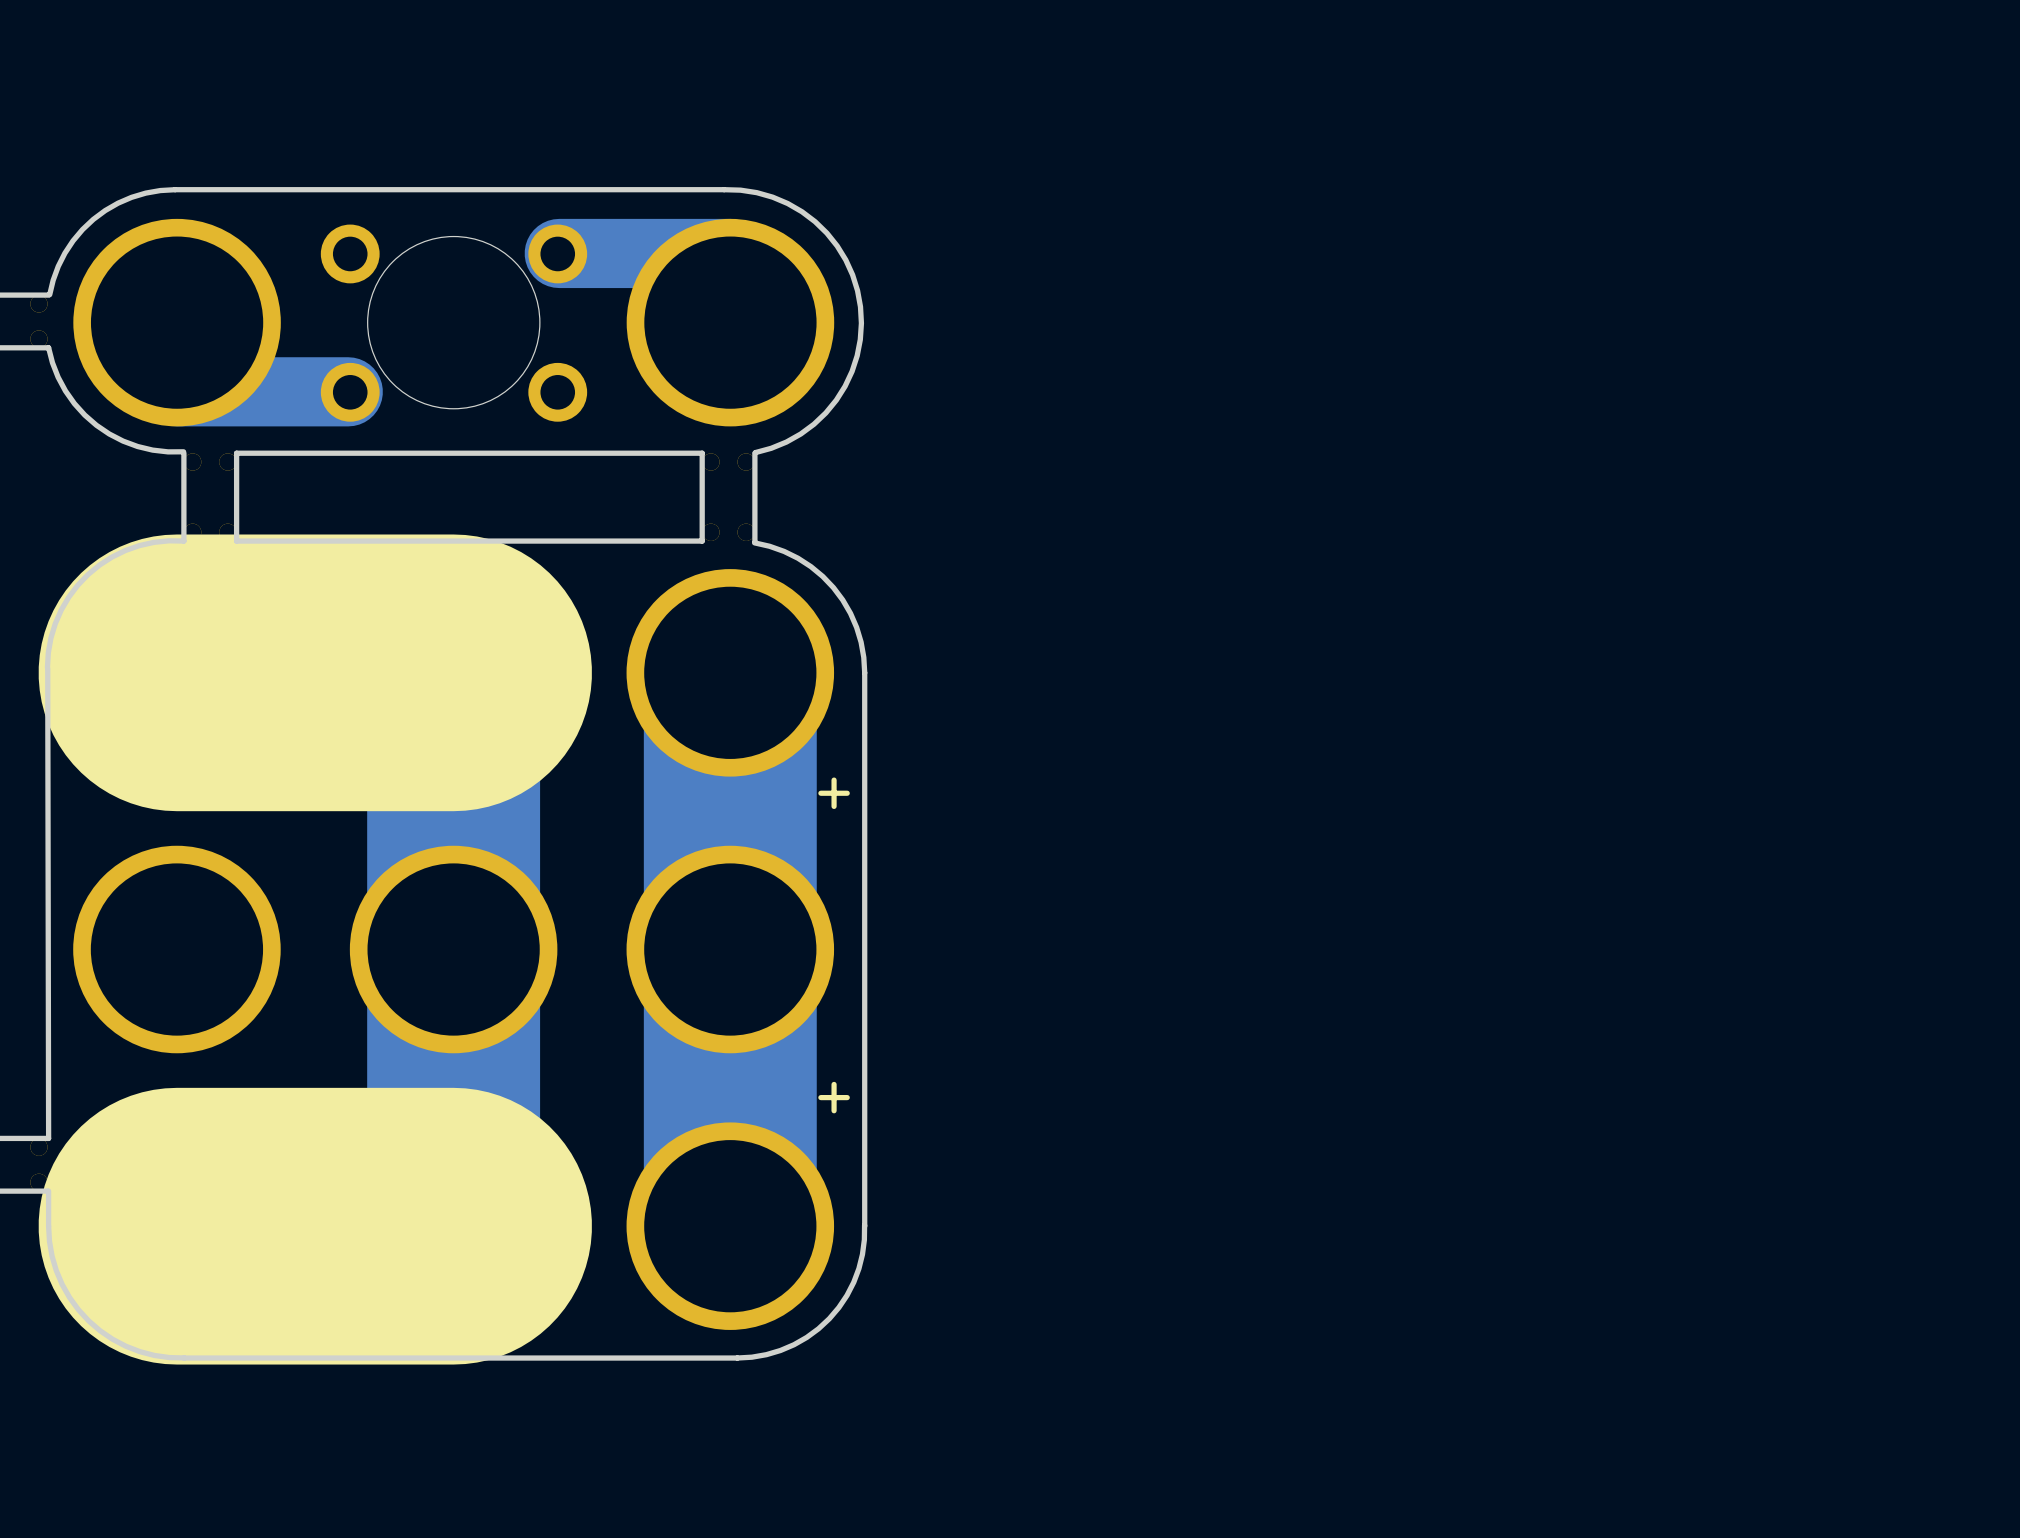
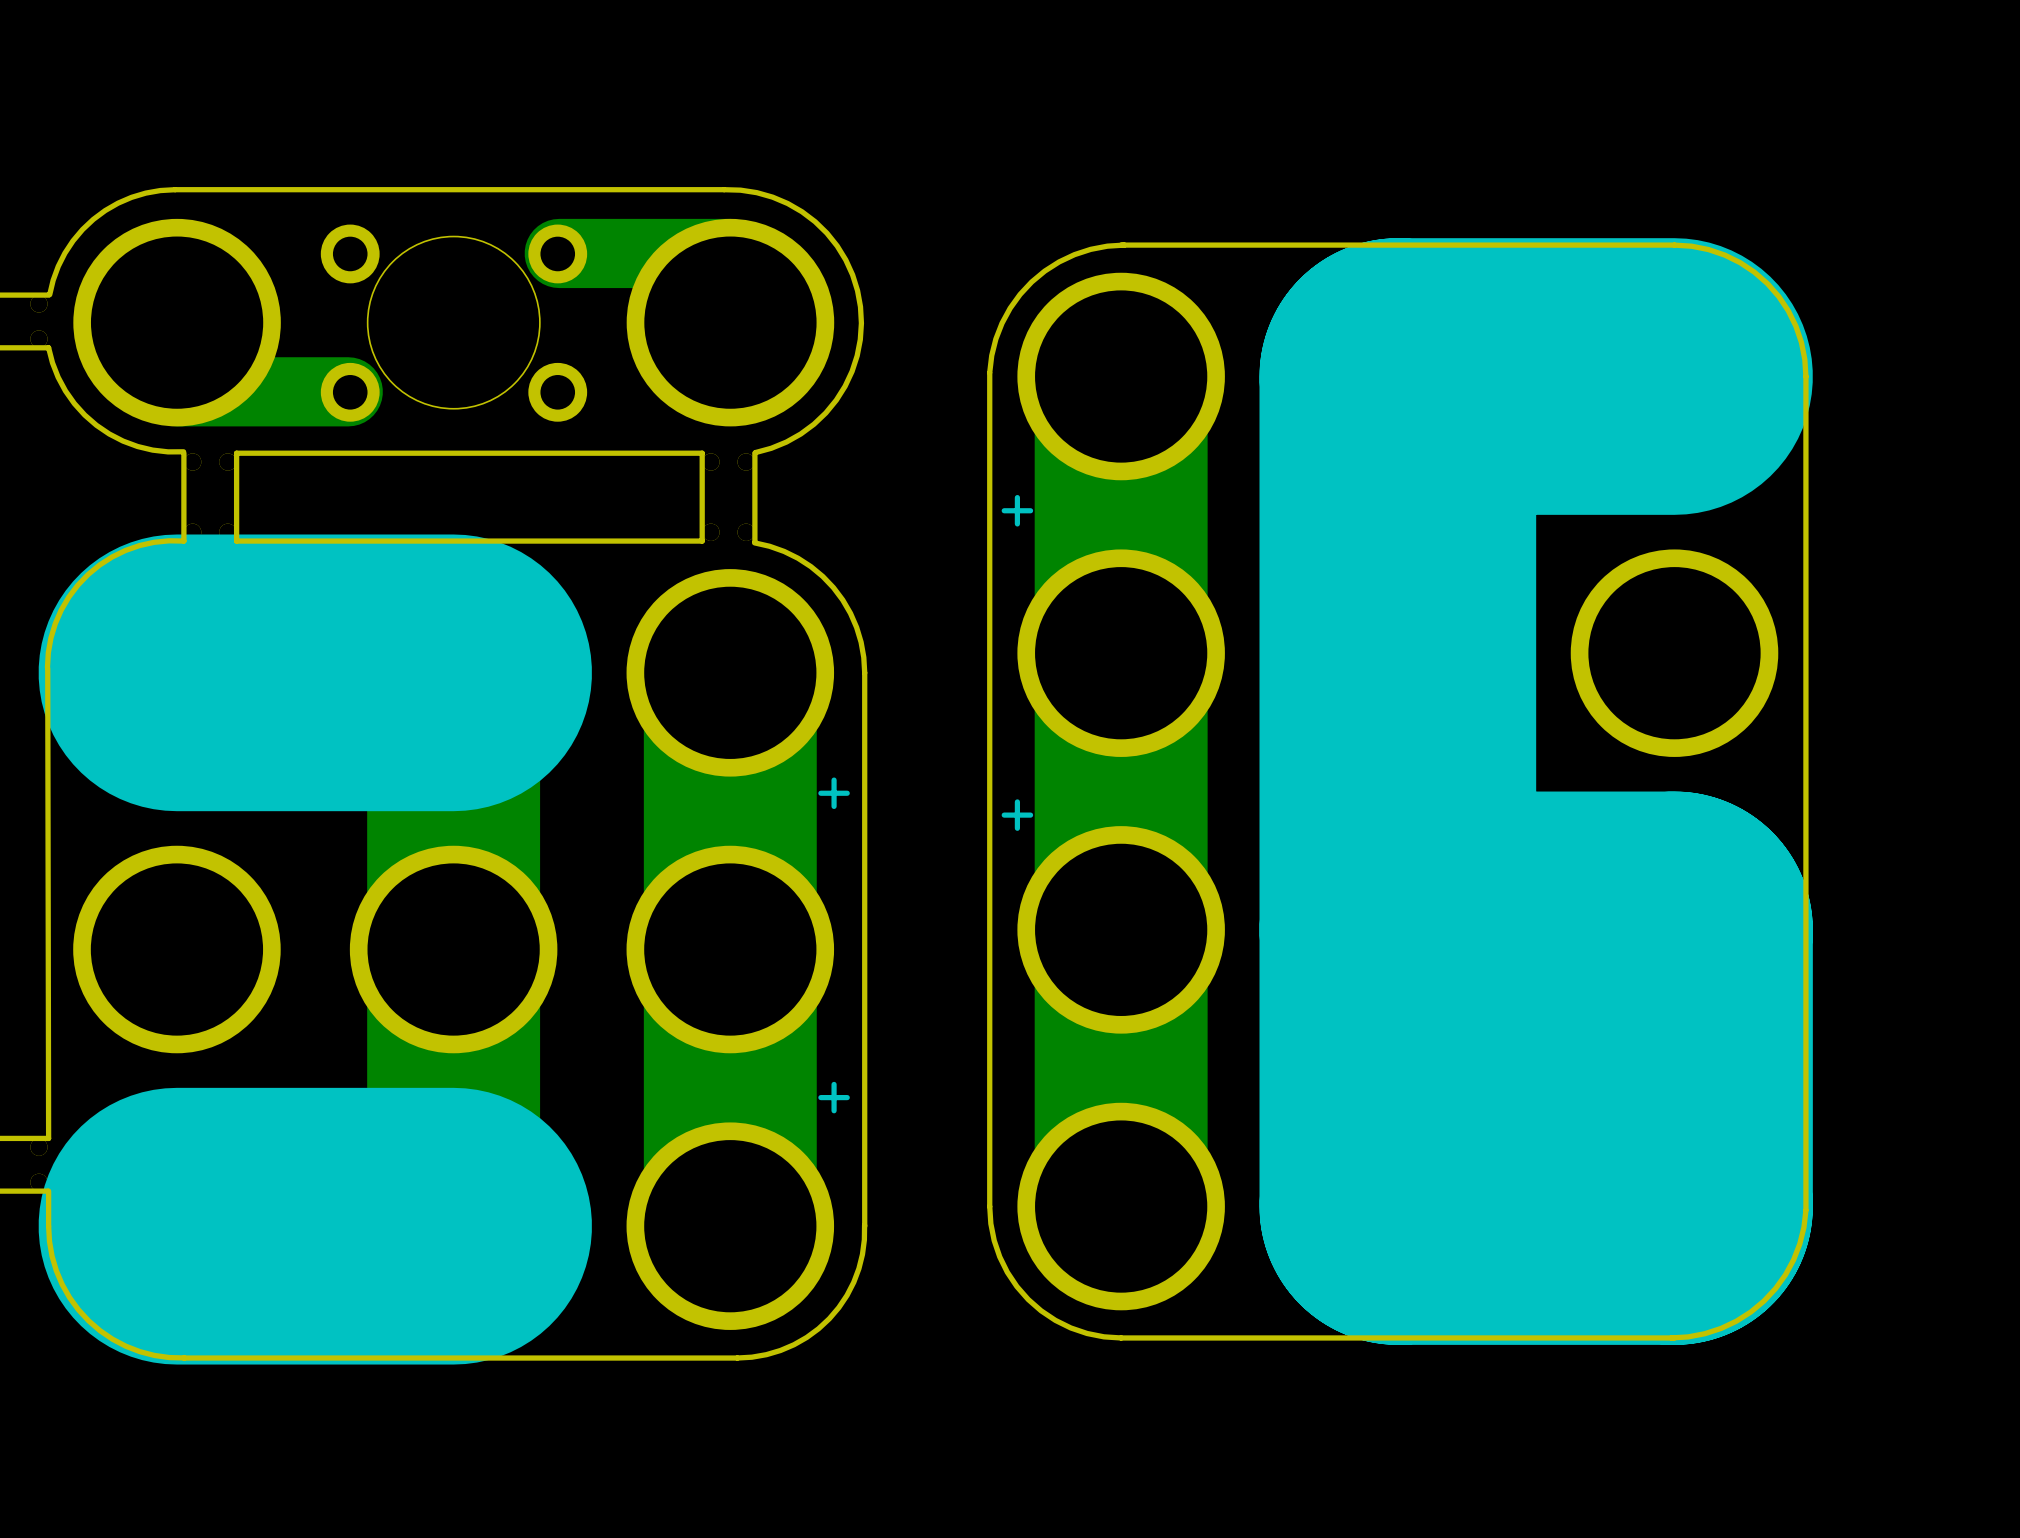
board edge: none -> (1121, 245) (1691, 246) (1708, 249) (1740, 262) (1767, 283) (1778, 296) (1795, 326) (1801, 342) (1805, 376) (1805, 1210)
board edge: none -> (1124, 245) (1107, 246) (1074, 254) (1059, 261) (1031, 281) (1010, 308) (1002, 323) (991, 355) (989, 372)
board edge: none -> (989, 373) (989, 1206) (990, 1223) (999, 1256) (1016, 1286) (1041, 1310) (1055, 1320) (1087, 1333) (1104, 1336) (1674, 1337)
part: none -> (1415, 791)
board edge: none -> (1805, 1210) (1799, 1243) (1793, 1259) (1775, 1288) (1763, 1301) (1750, 1311) (1721, 1328) (1688, 1336) (1671, 1337)

